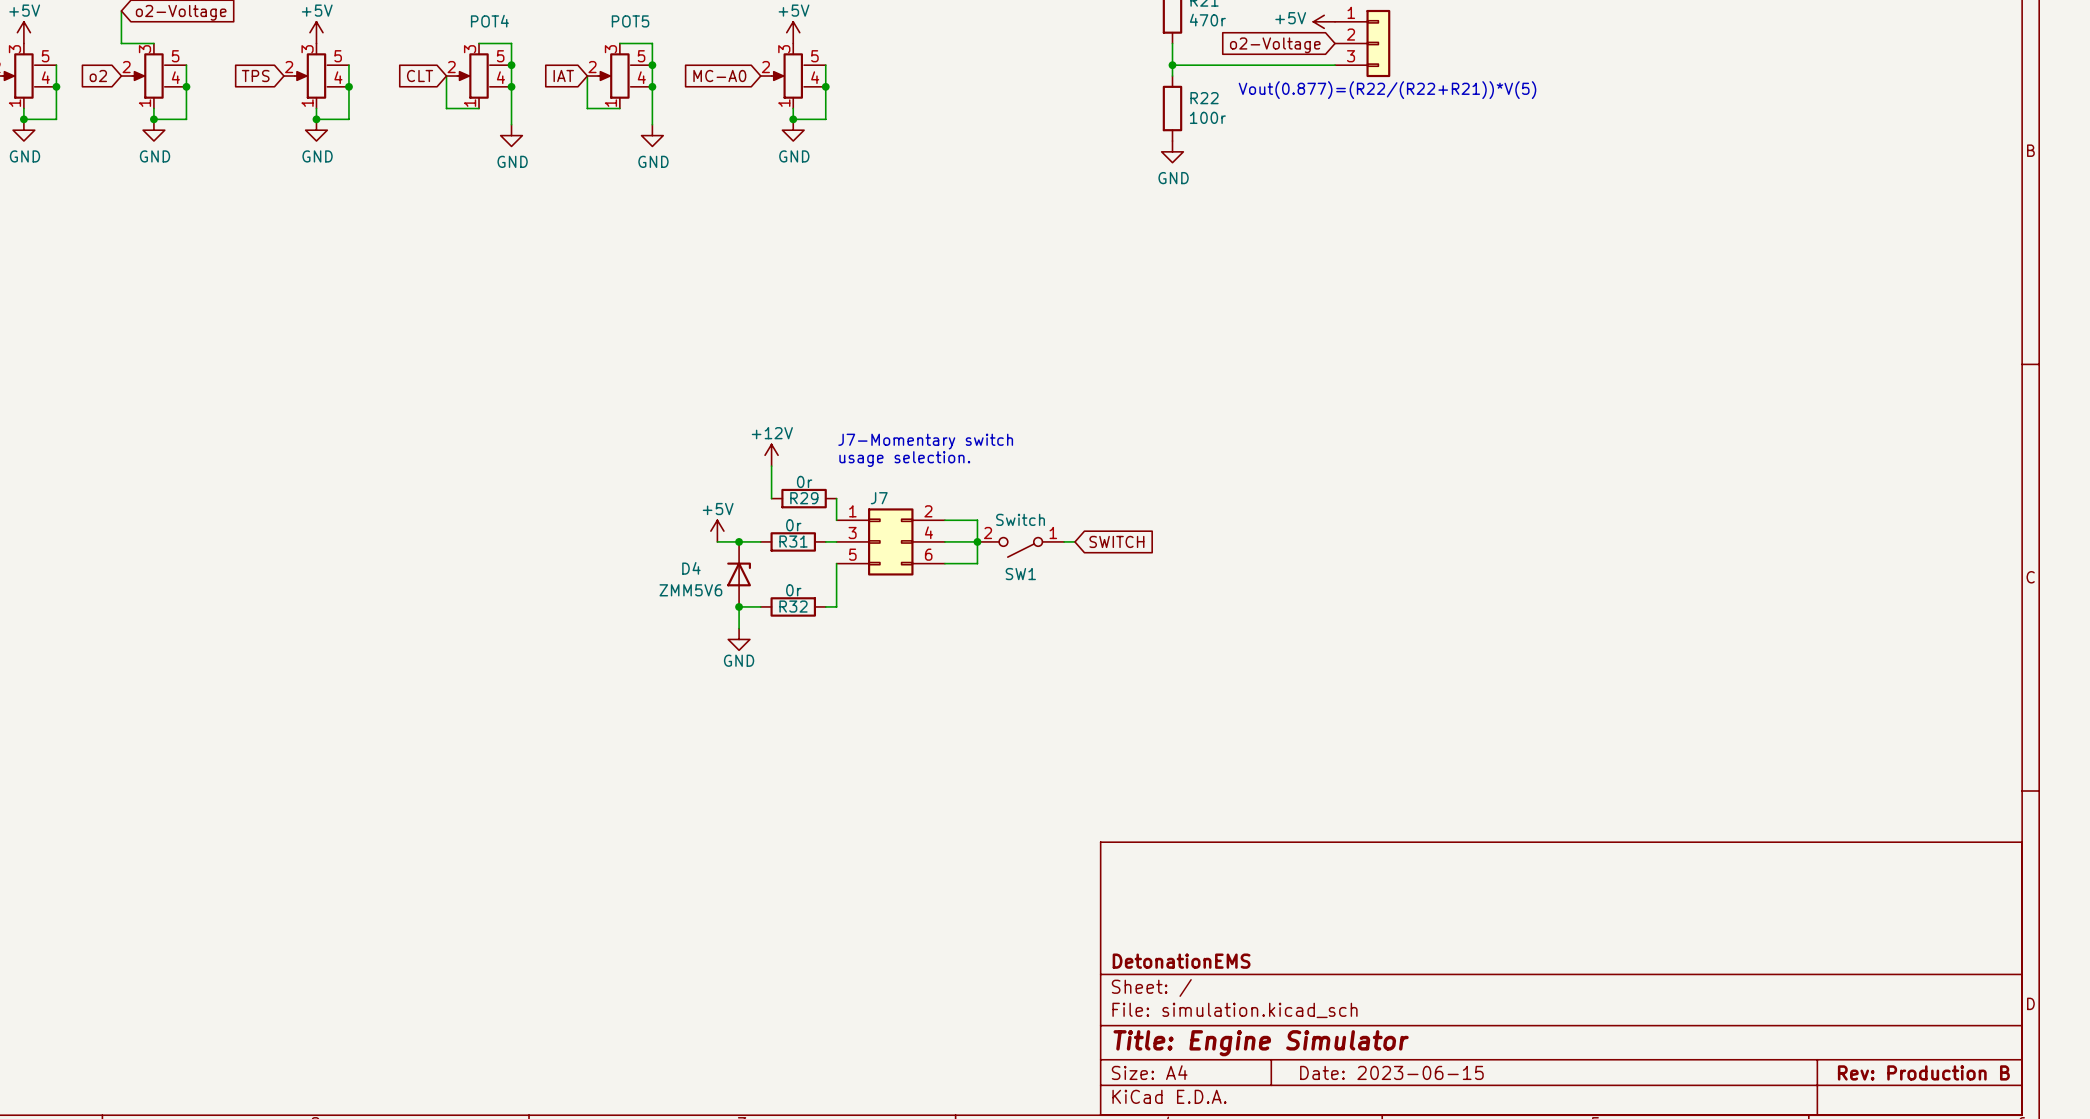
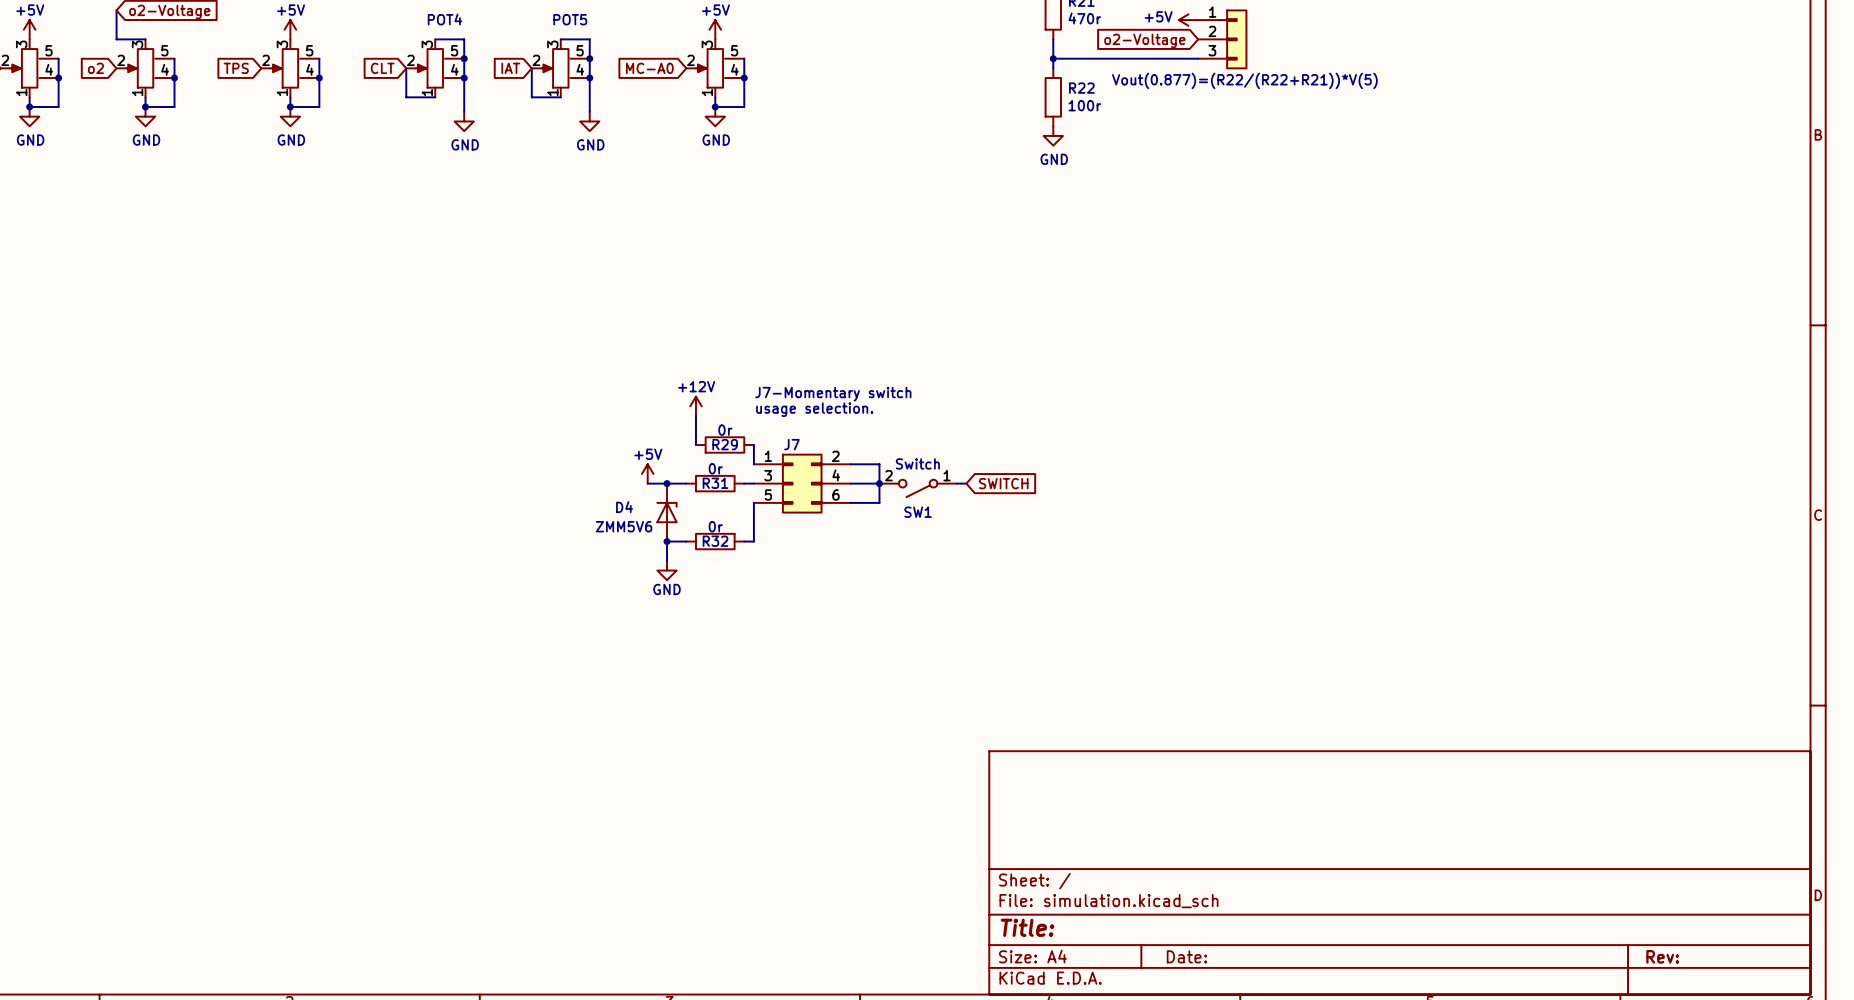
title block: DetonationEMS (1181, 961) -> none
title block: Title: Engine Simulator (1261, 1043) -> Title: (1027, 927)
title block: Date: 2023-06-15 (1391, 1072) -> Date: (1186, 956)
title block: Rev: Production B (1923, 1072) -> Rev: (1662, 956)

